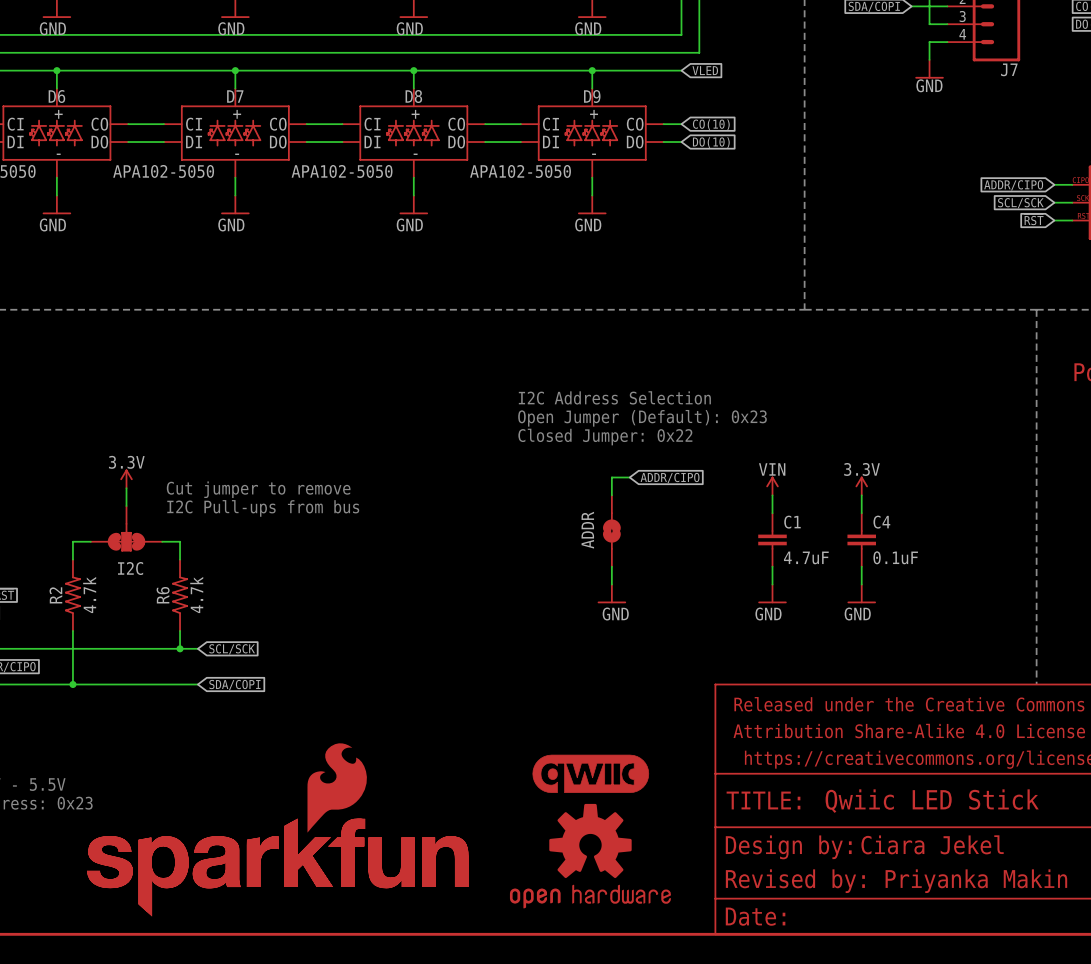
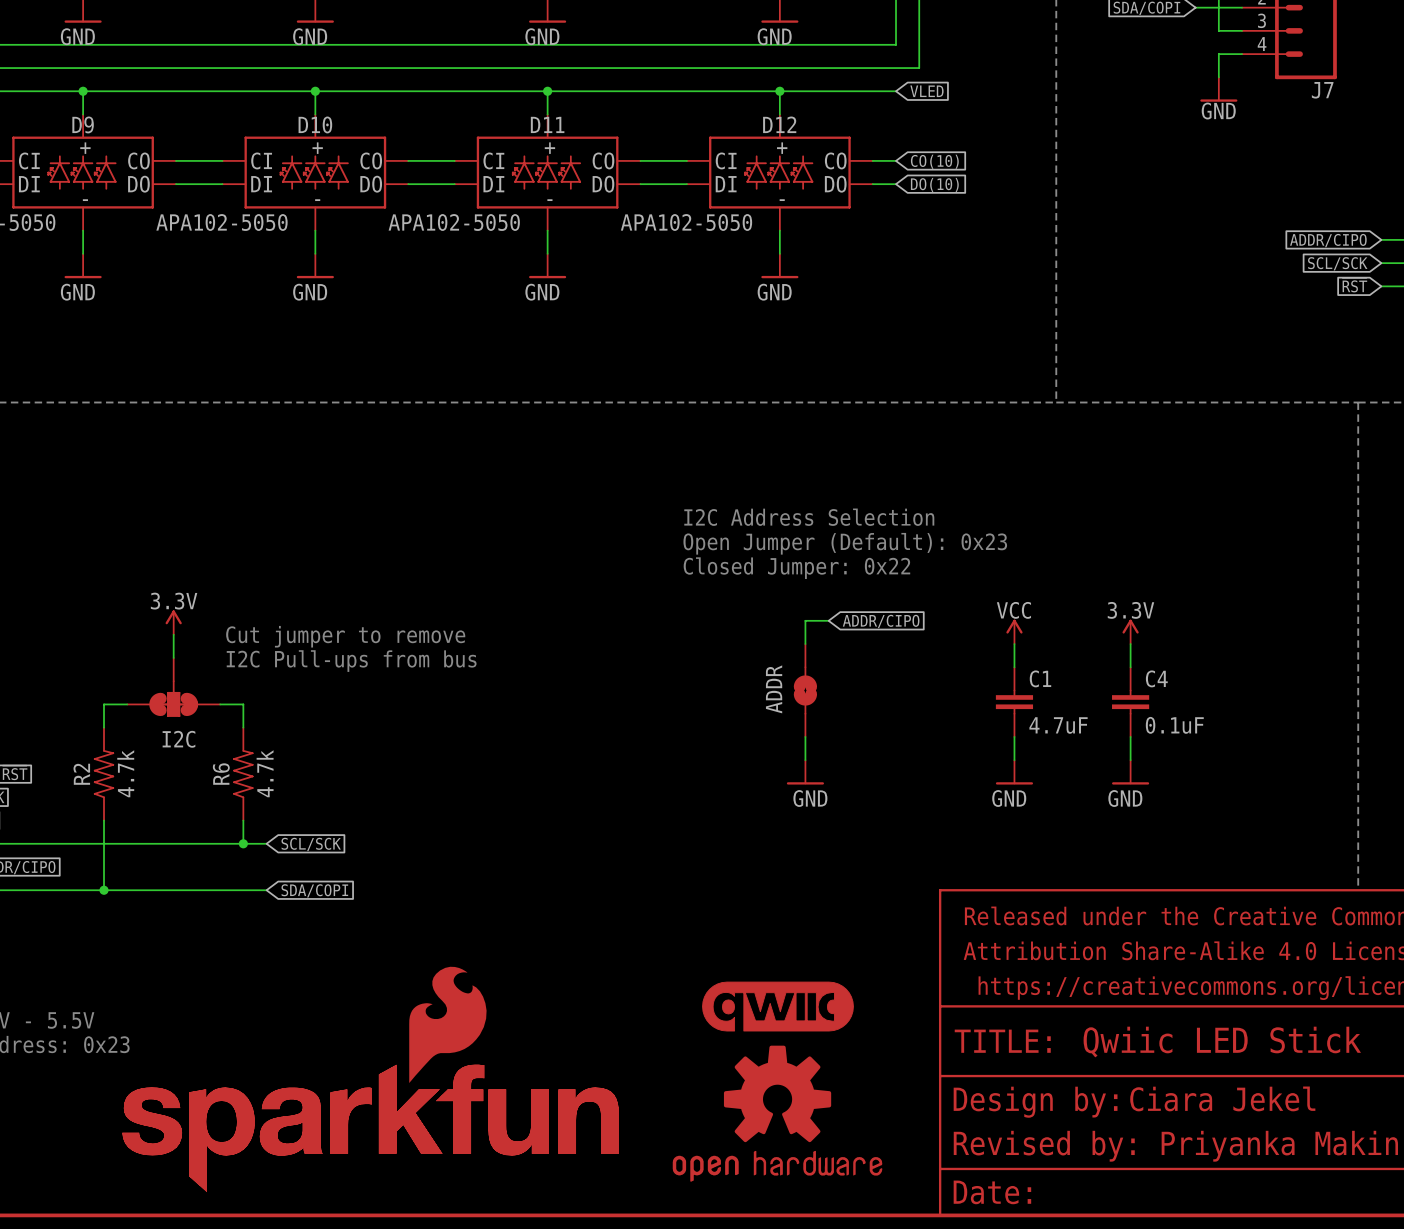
D6 name: D6 (56, 96) -> D9 (83, 124)
D7 name: D7 (235, 96) -> D10 (315, 124)
D8 name: D8 (413, 96) -> D11 (547, 124)
D9 name: D9 (592, 96) -> D12 (779, 124)
power symbol: VIN (772, 485) -> VCC (1014, 631)

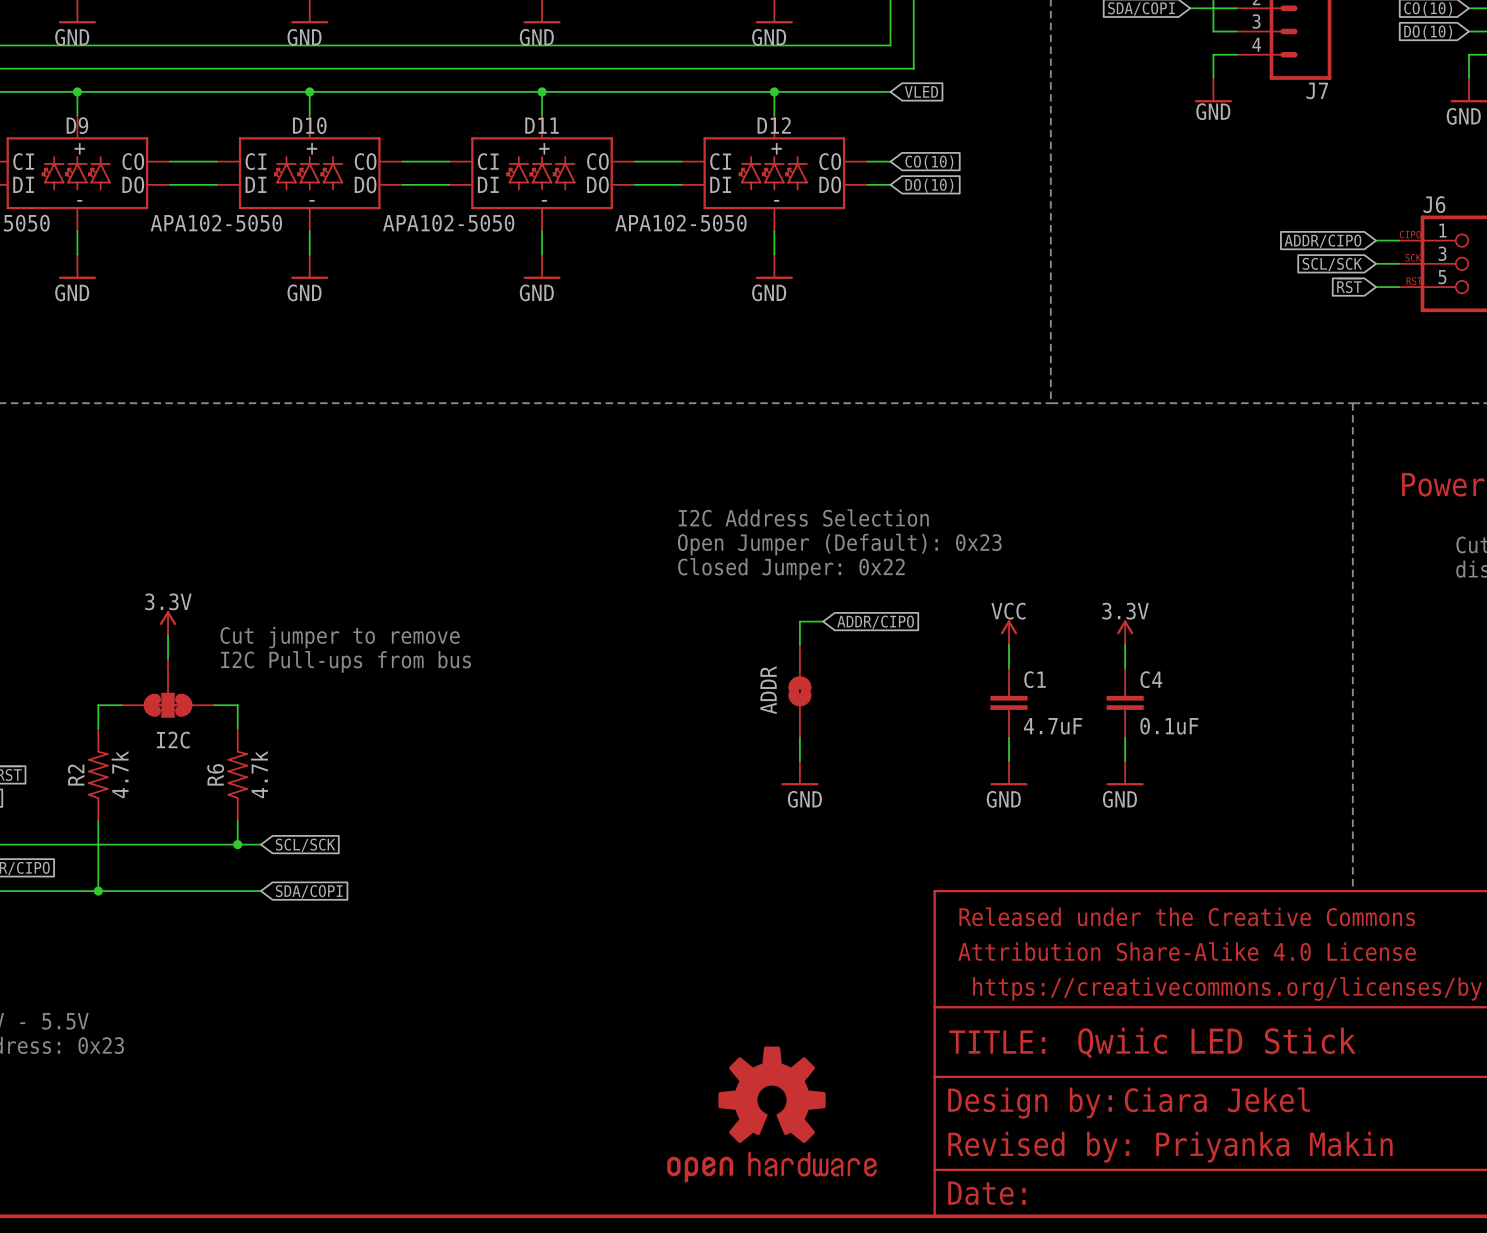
part: (777, 1006) -> none
part: (447, 1024) -> none
part: (370, 1128) -> none

